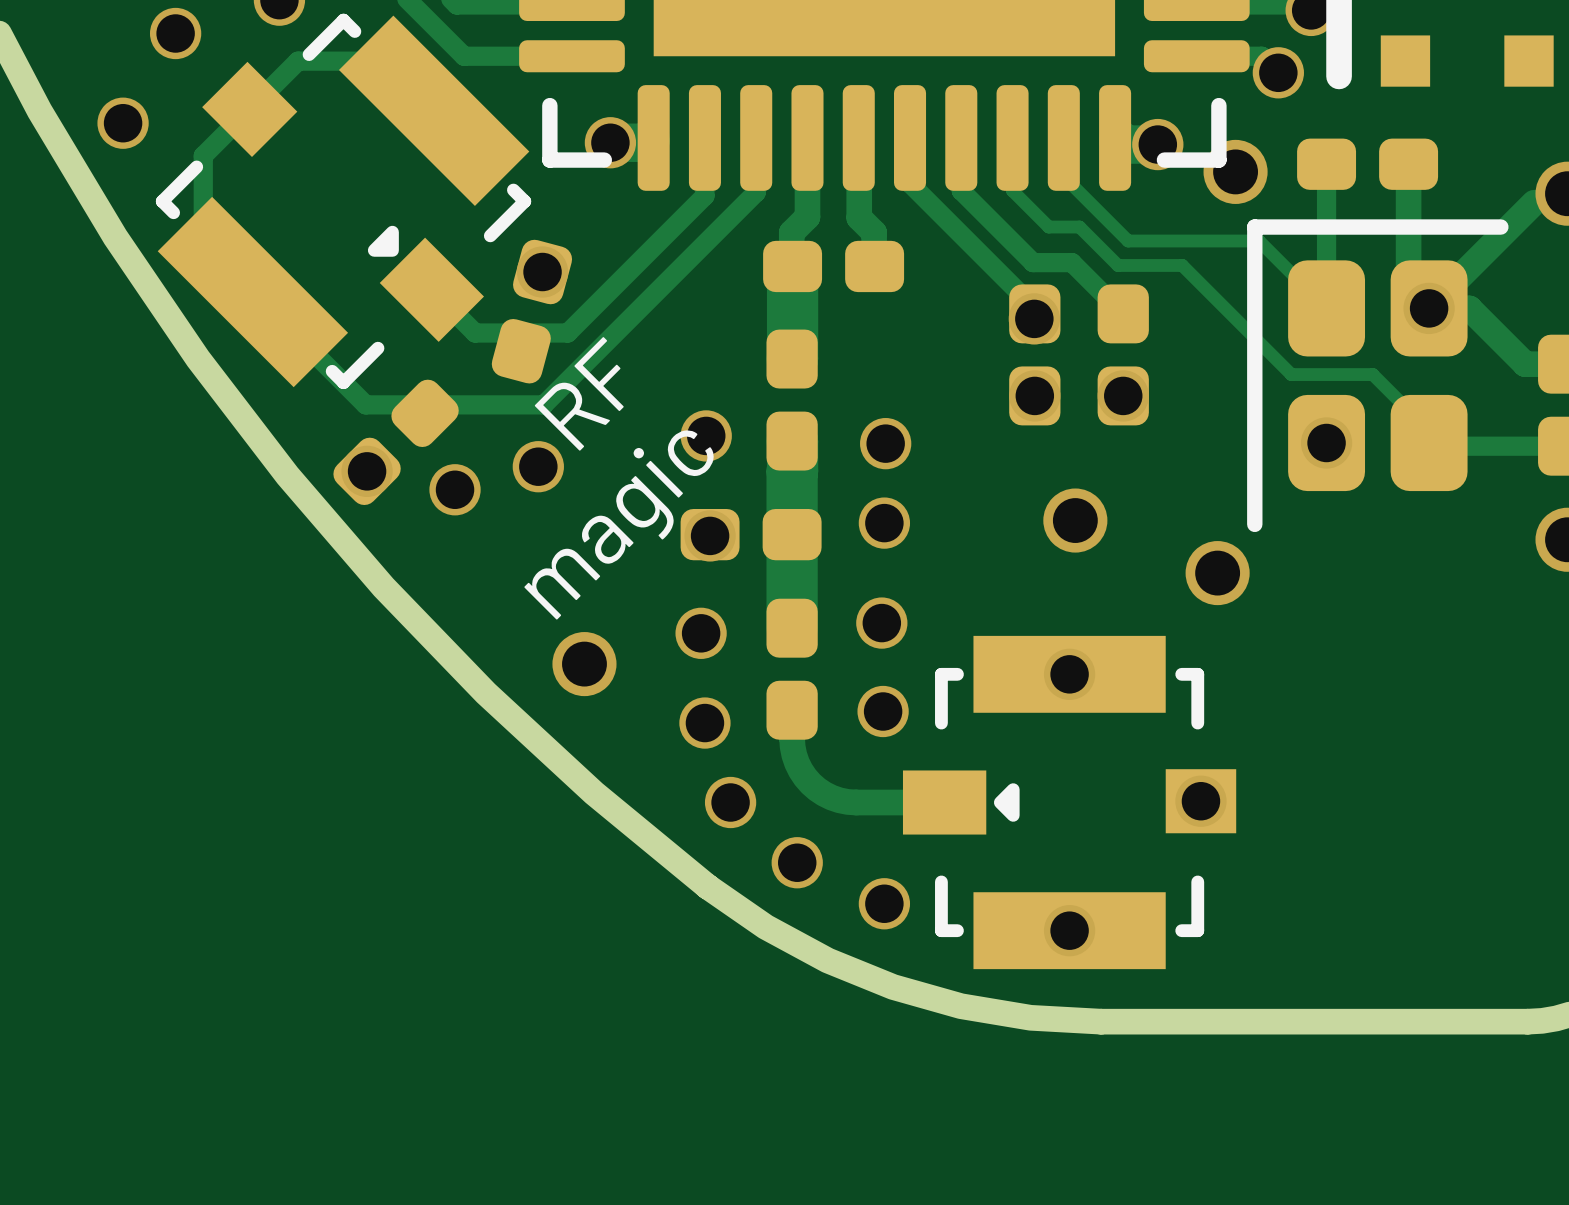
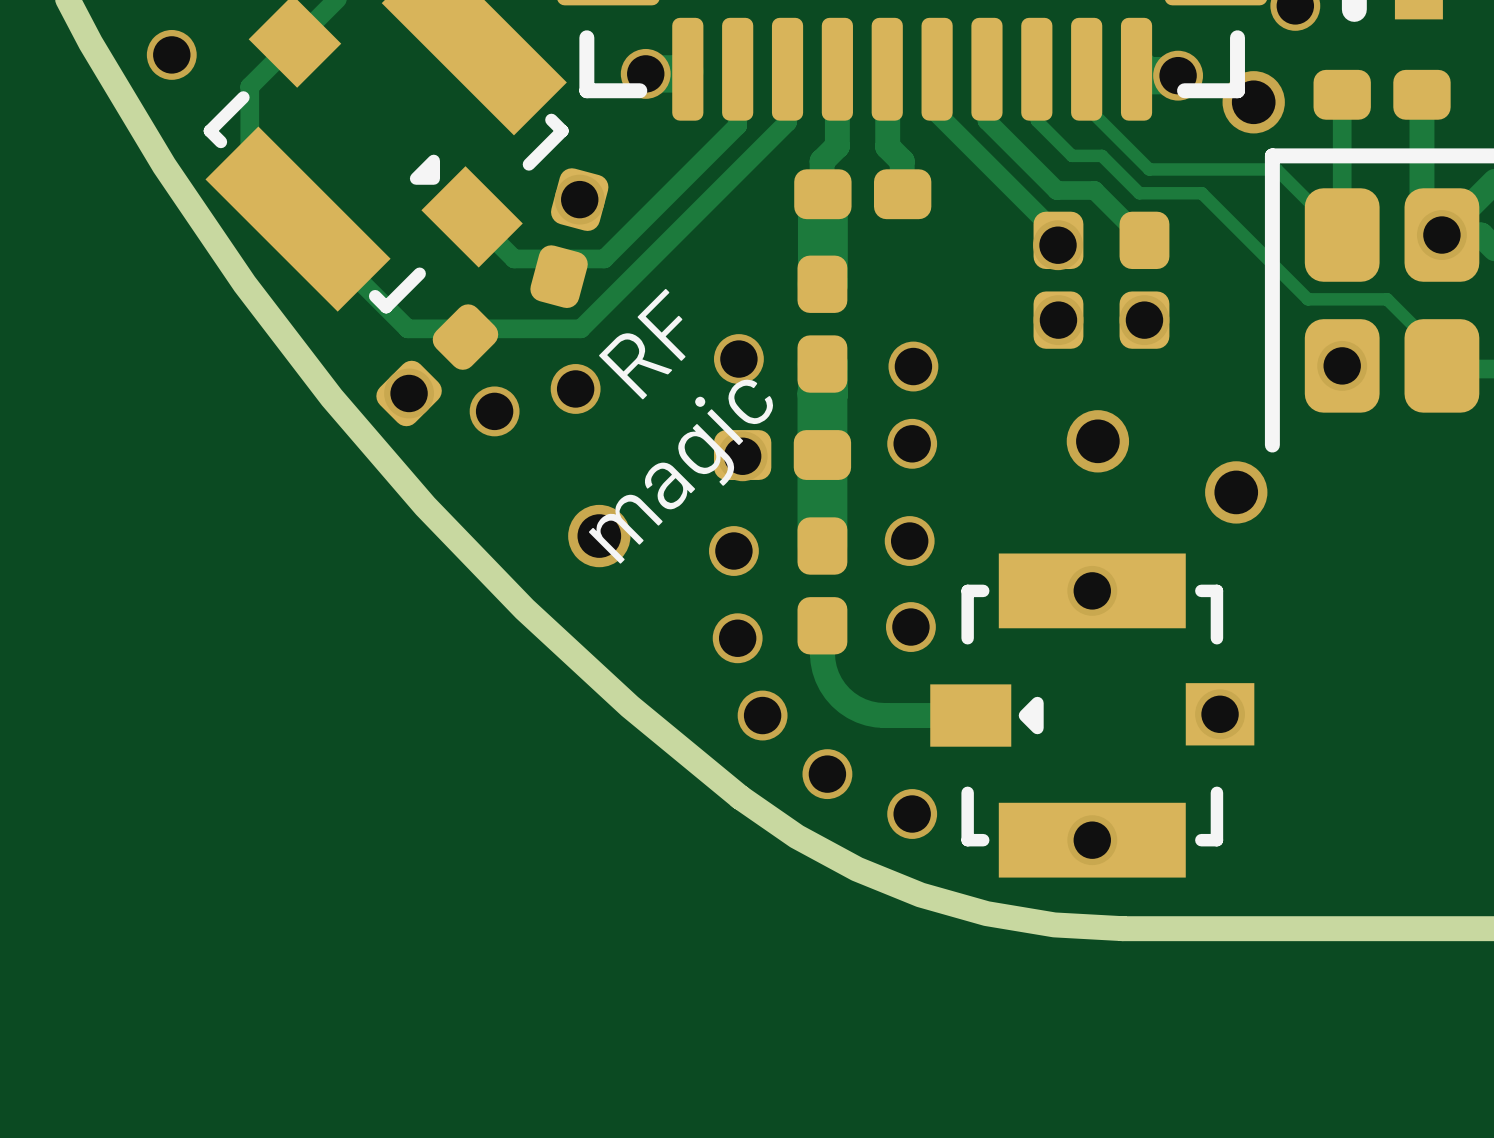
text position: RF (579, 393) -> RF (642, 344)
text position: magic (619, 524) -> magic (681, 471)
via position: (584, 664) -> (599, 536)

